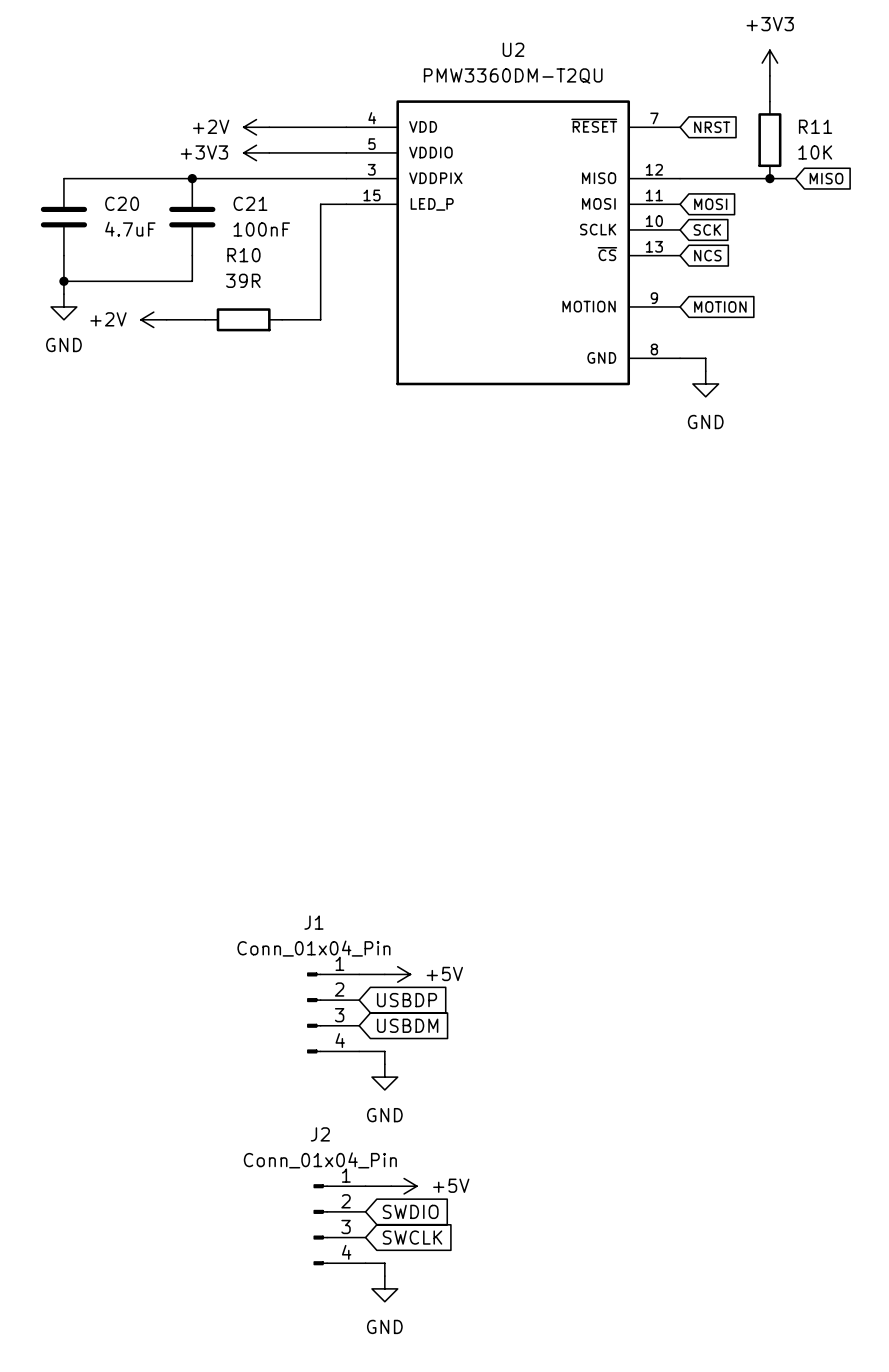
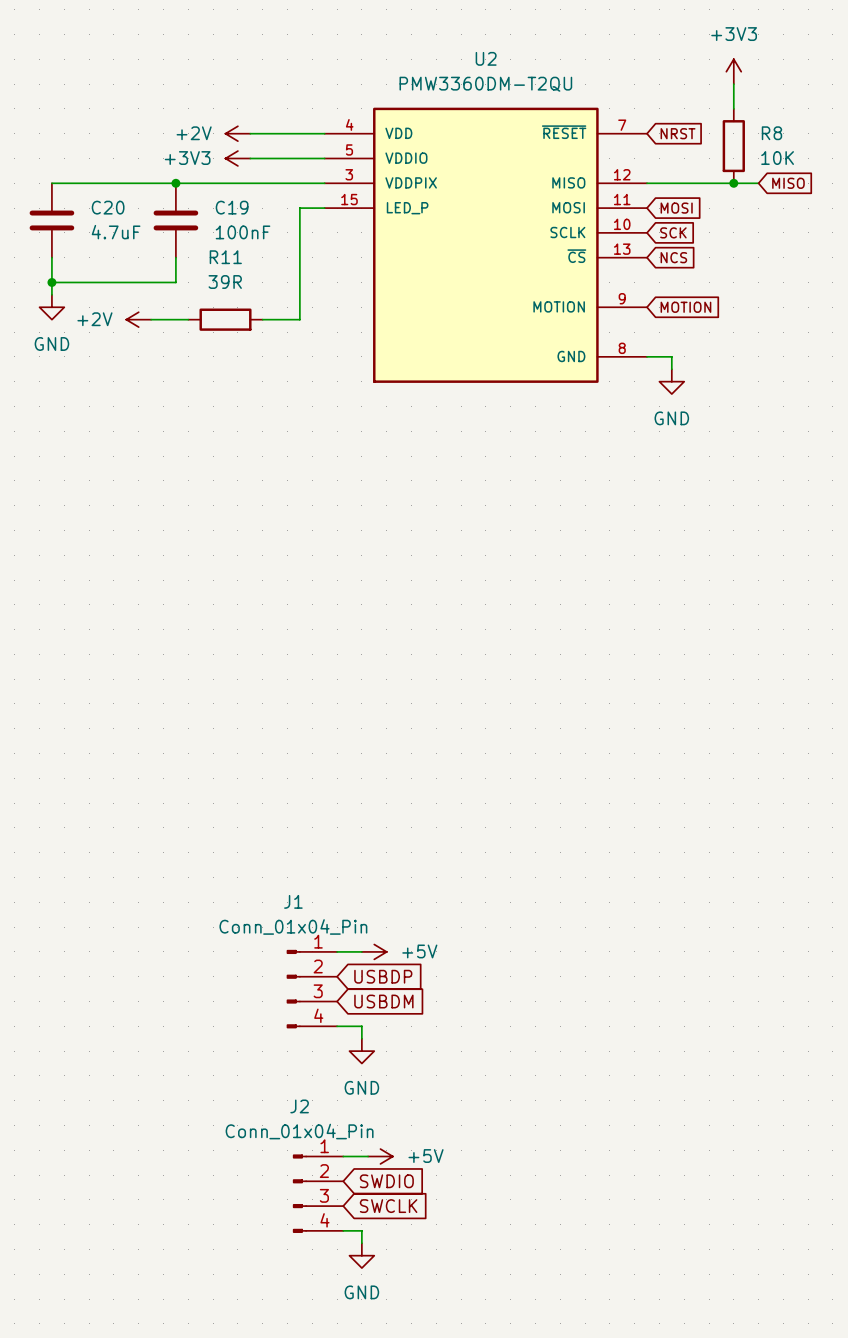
R11 name: R11 (815, 126) -> R8 (771, 133)
C21 name: C21 (250, 203) -> C19 (232, 207)
R10 name: R10 (243, 255) -> R11 (225, 257)

